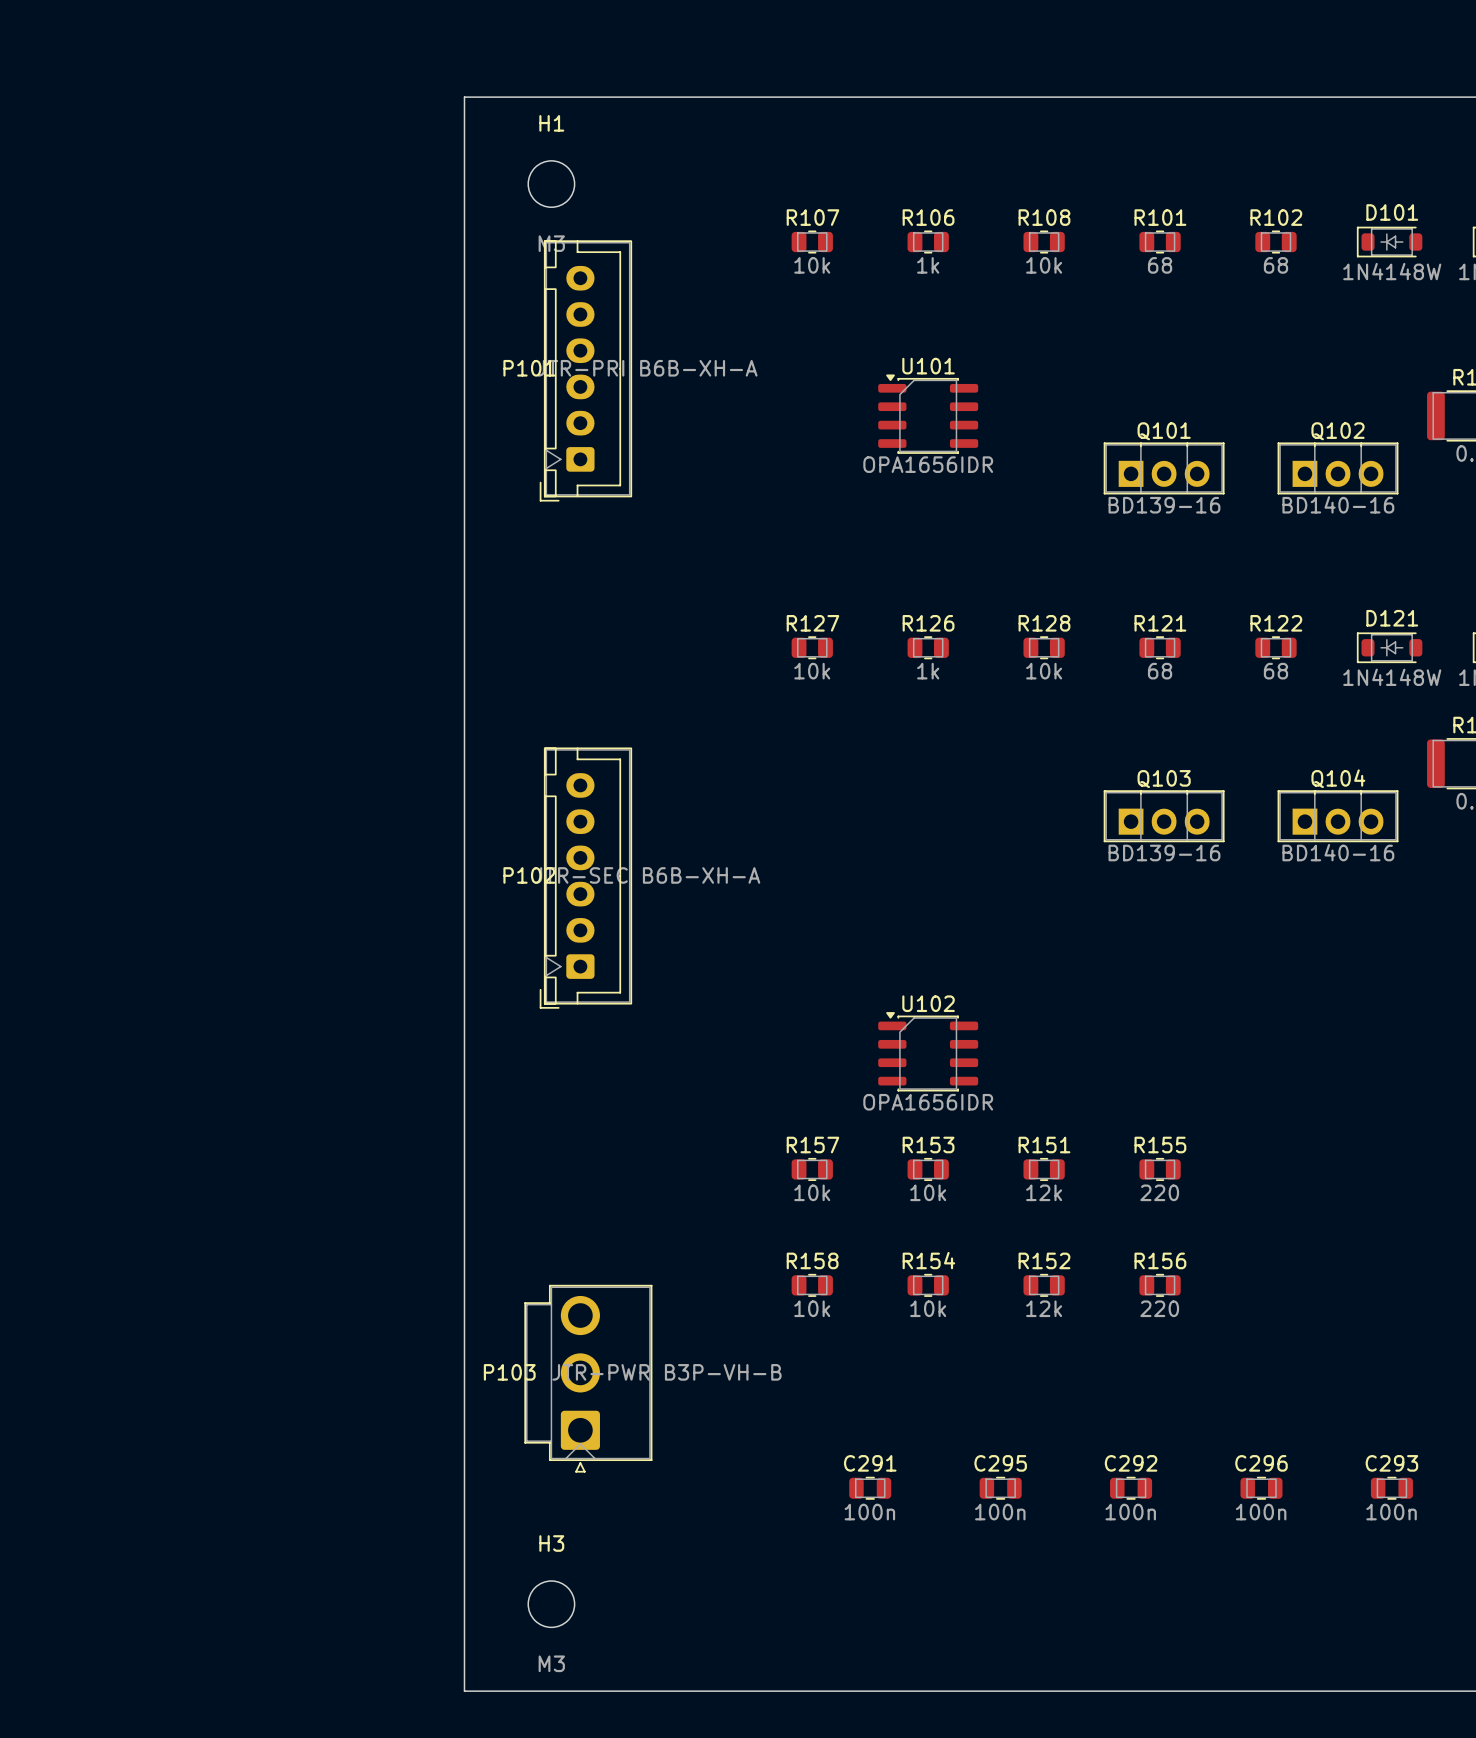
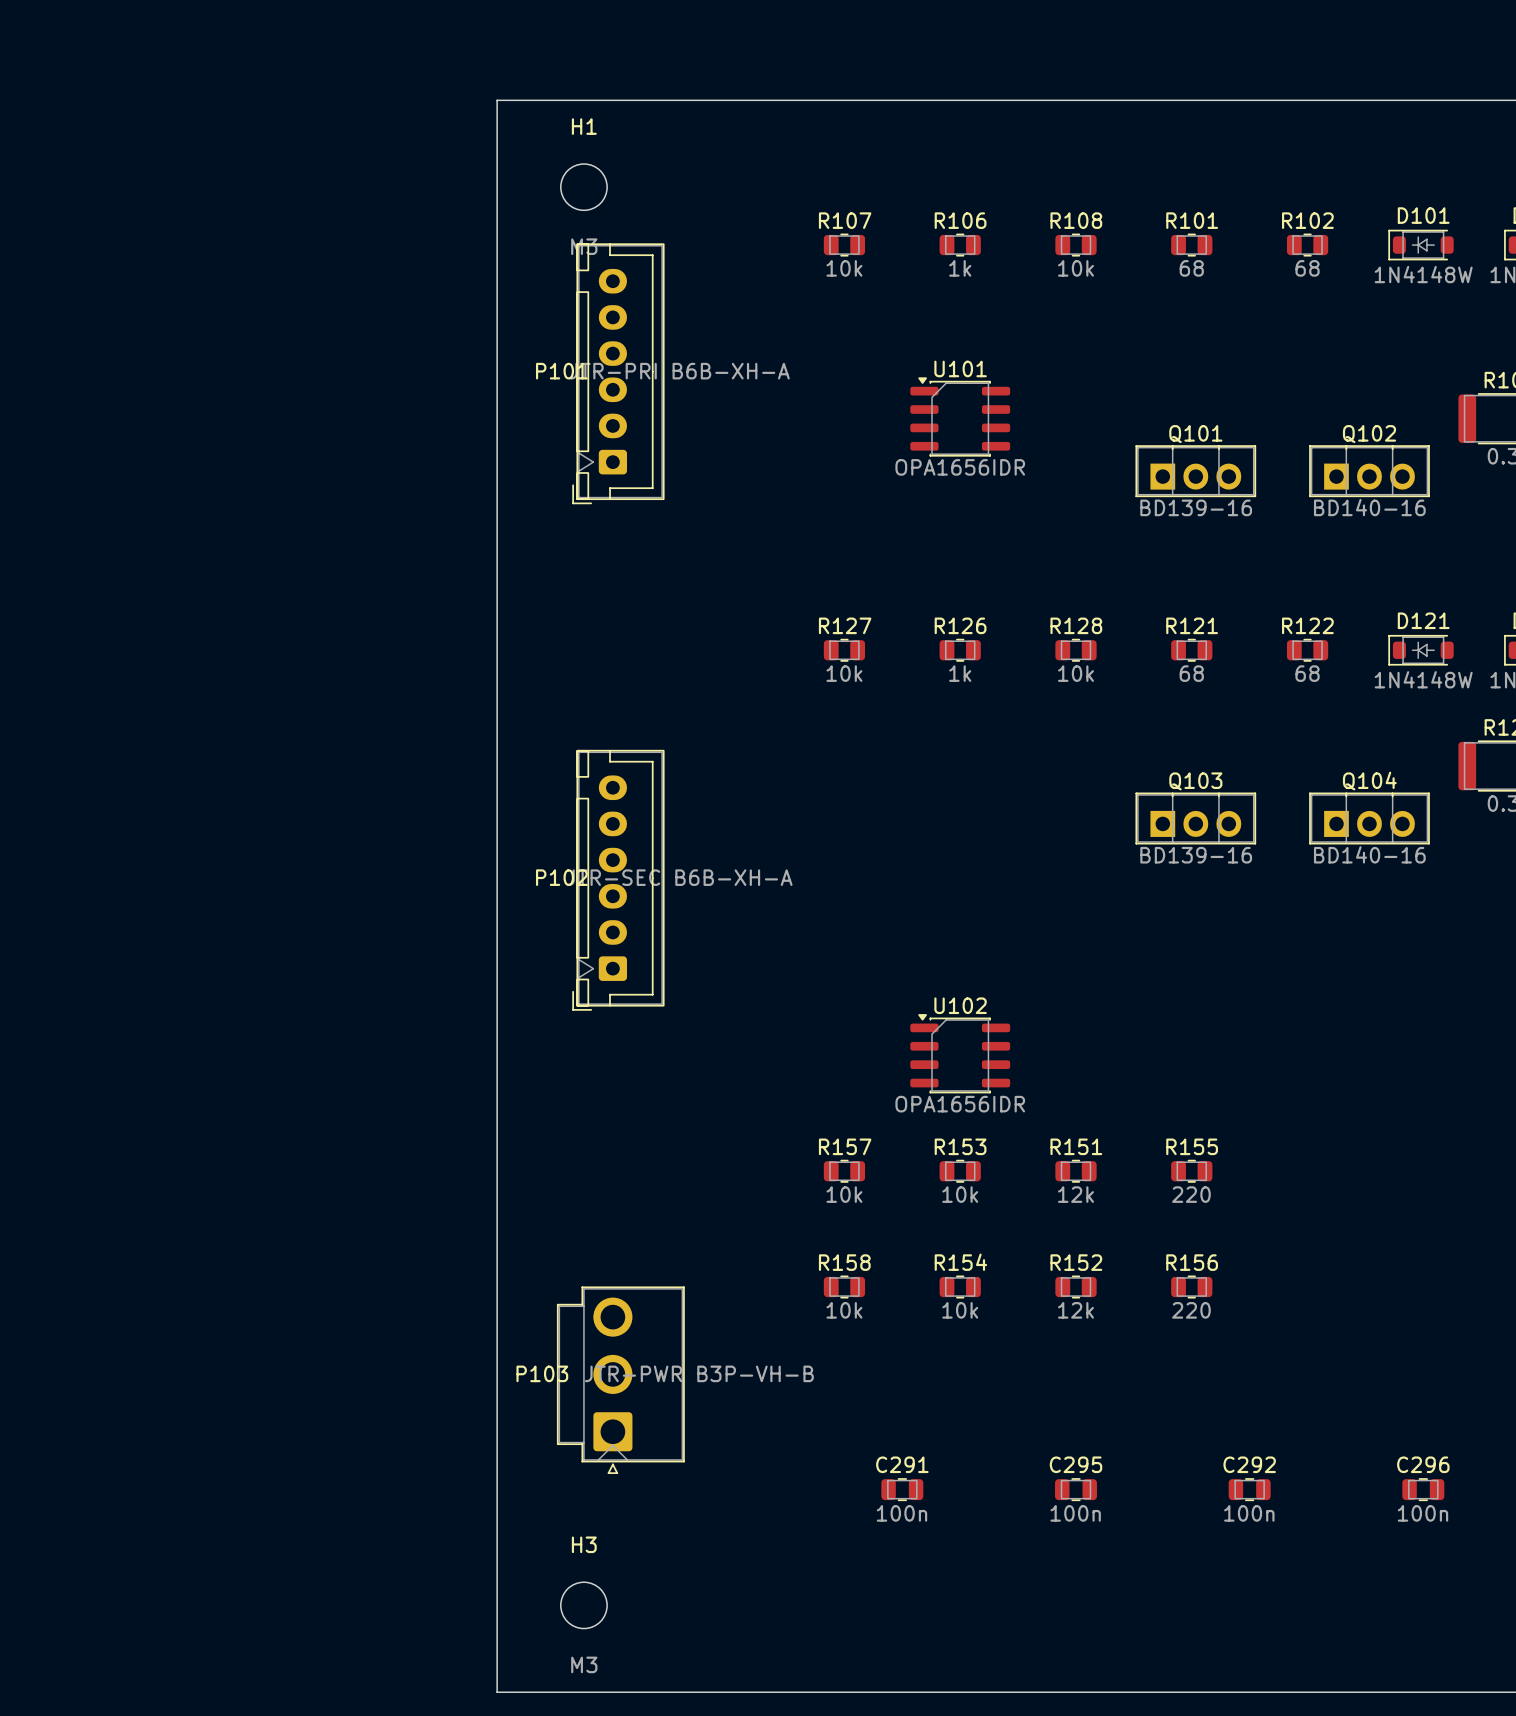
C293 name: C293 (1391, 1463) -> C296 (1423, 1464)
C295 position: (1000, 1488) -> (1076, 1489)
C292 position: (1131, 1488) -> (1249, 1489)
C296: 100n (1261, 1488) -> none

